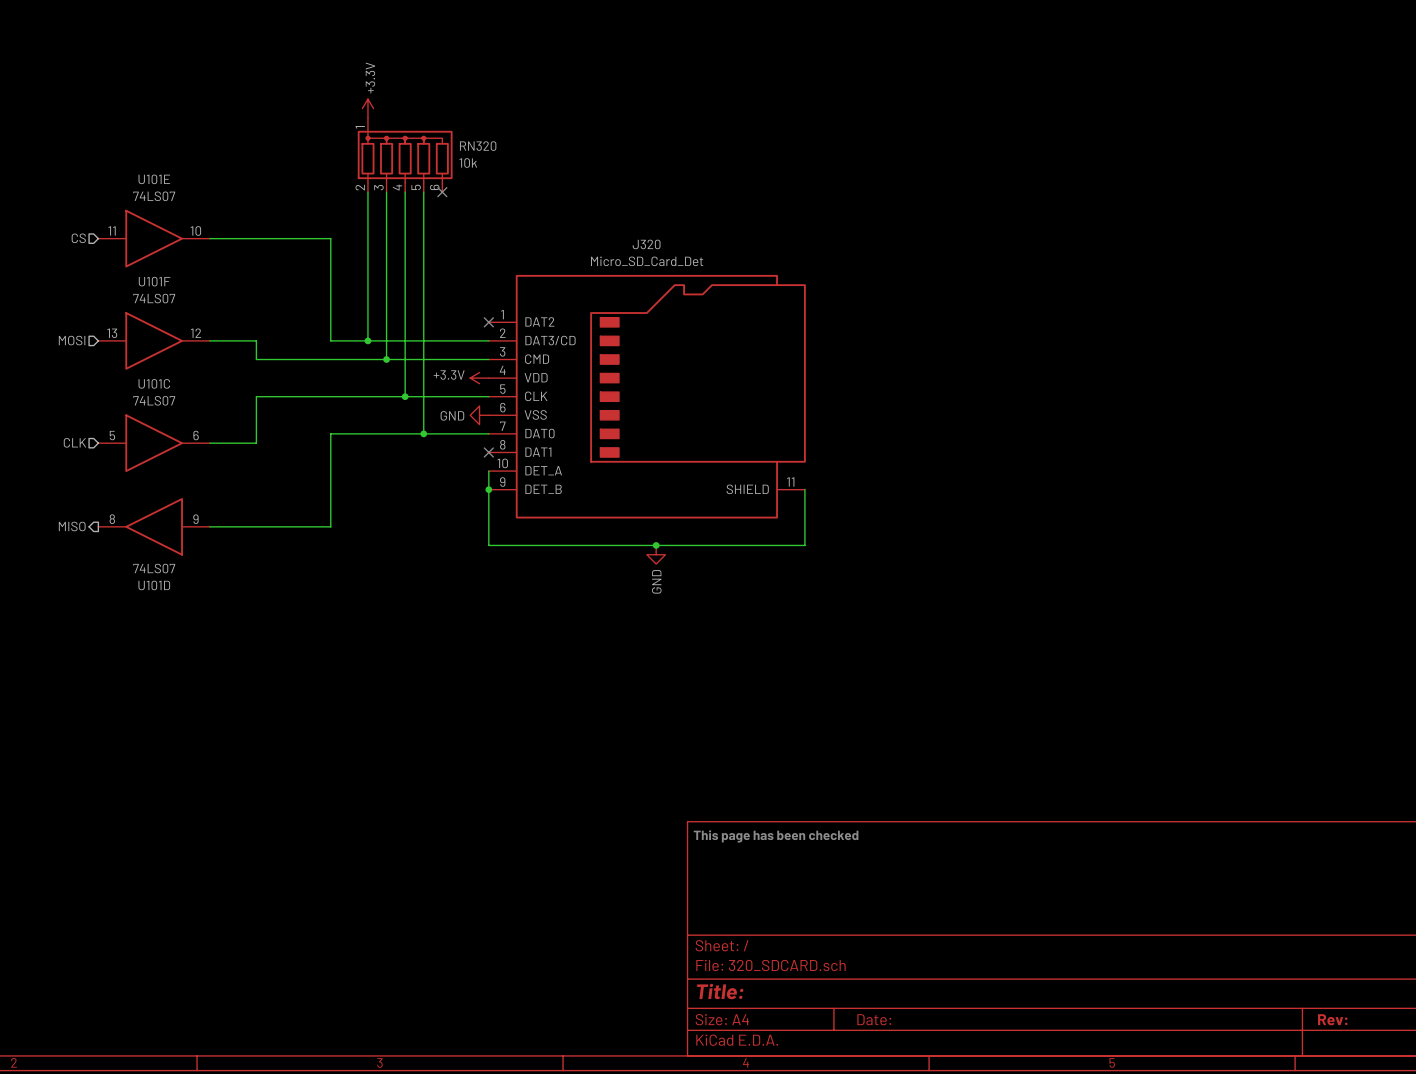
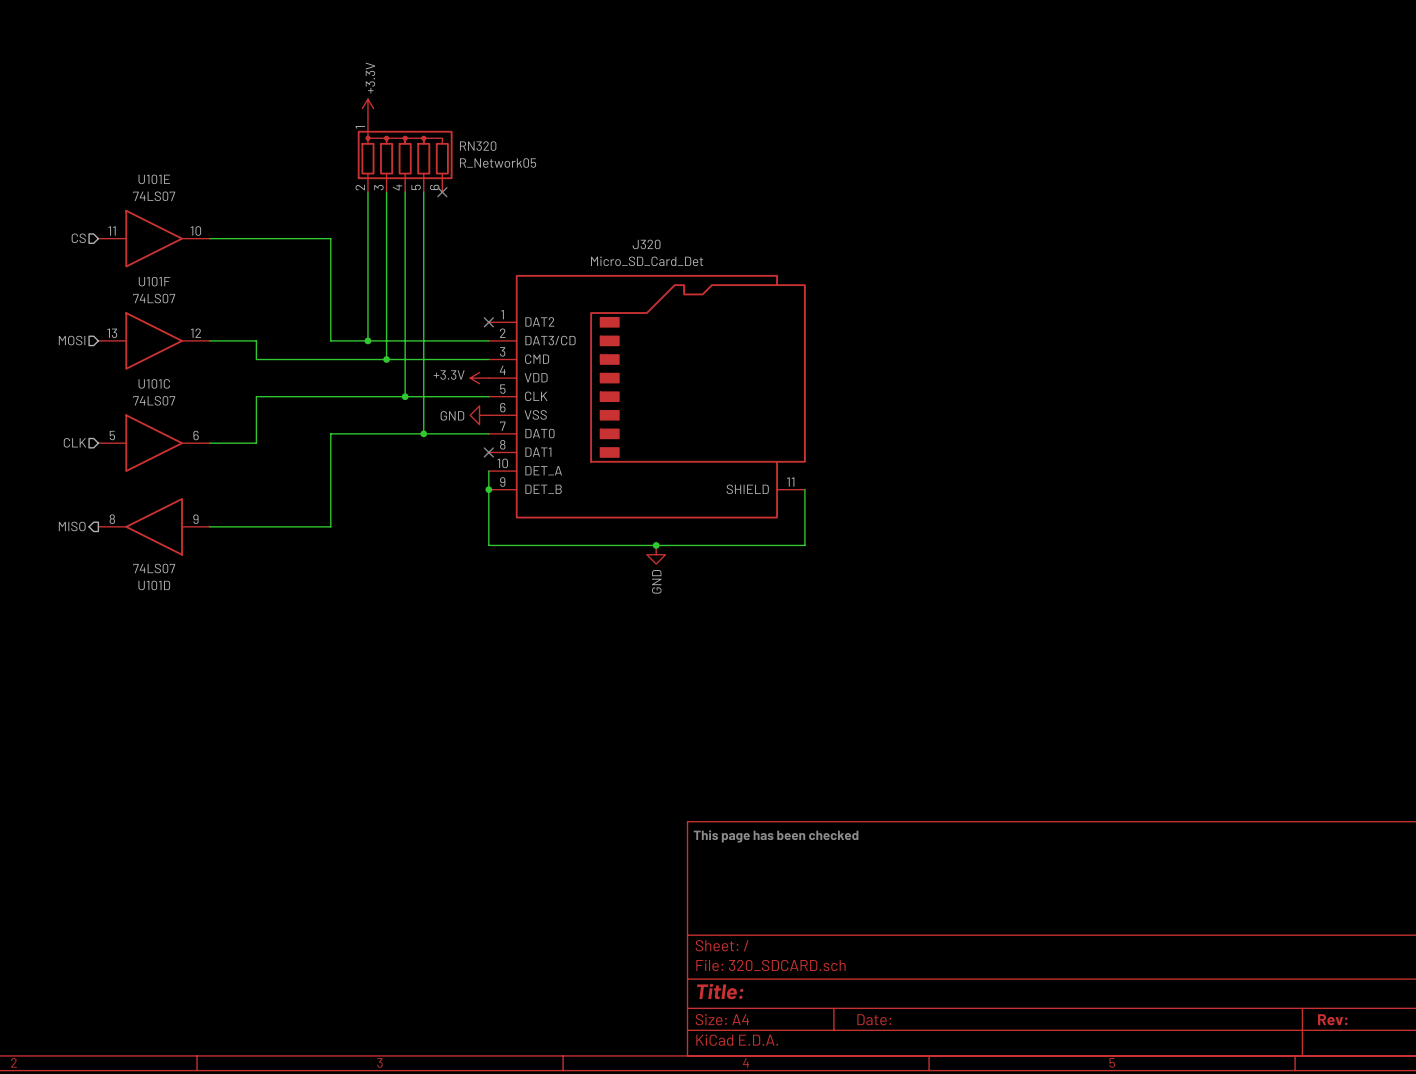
RN320 value: 10k (468, 163) -> R_Network05 (498, 163)

